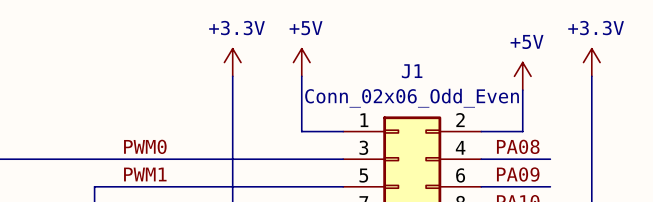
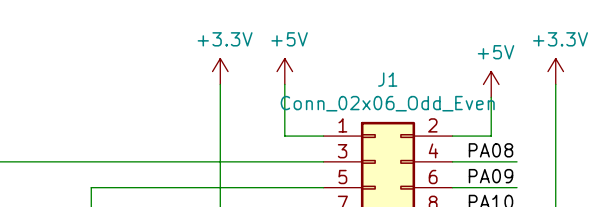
label: PWM0 (145, 146) -> none
label: PWM1 (145, 174) -> none

